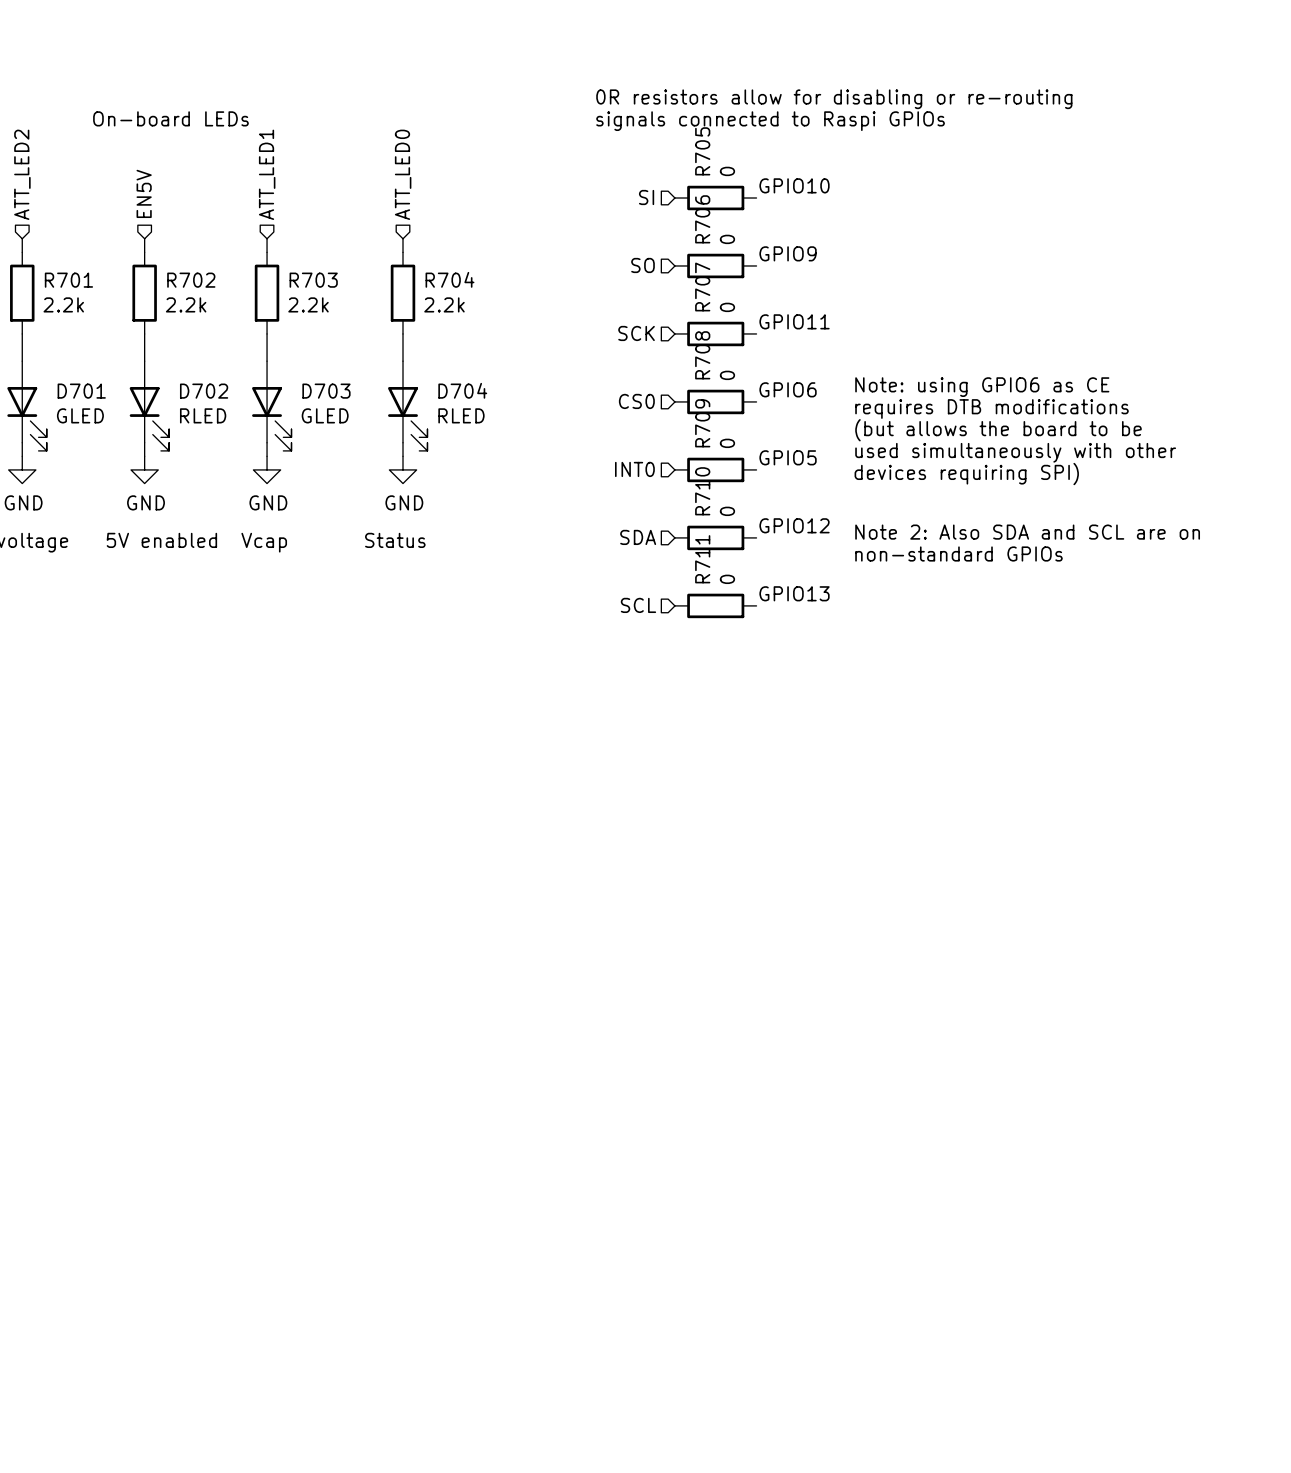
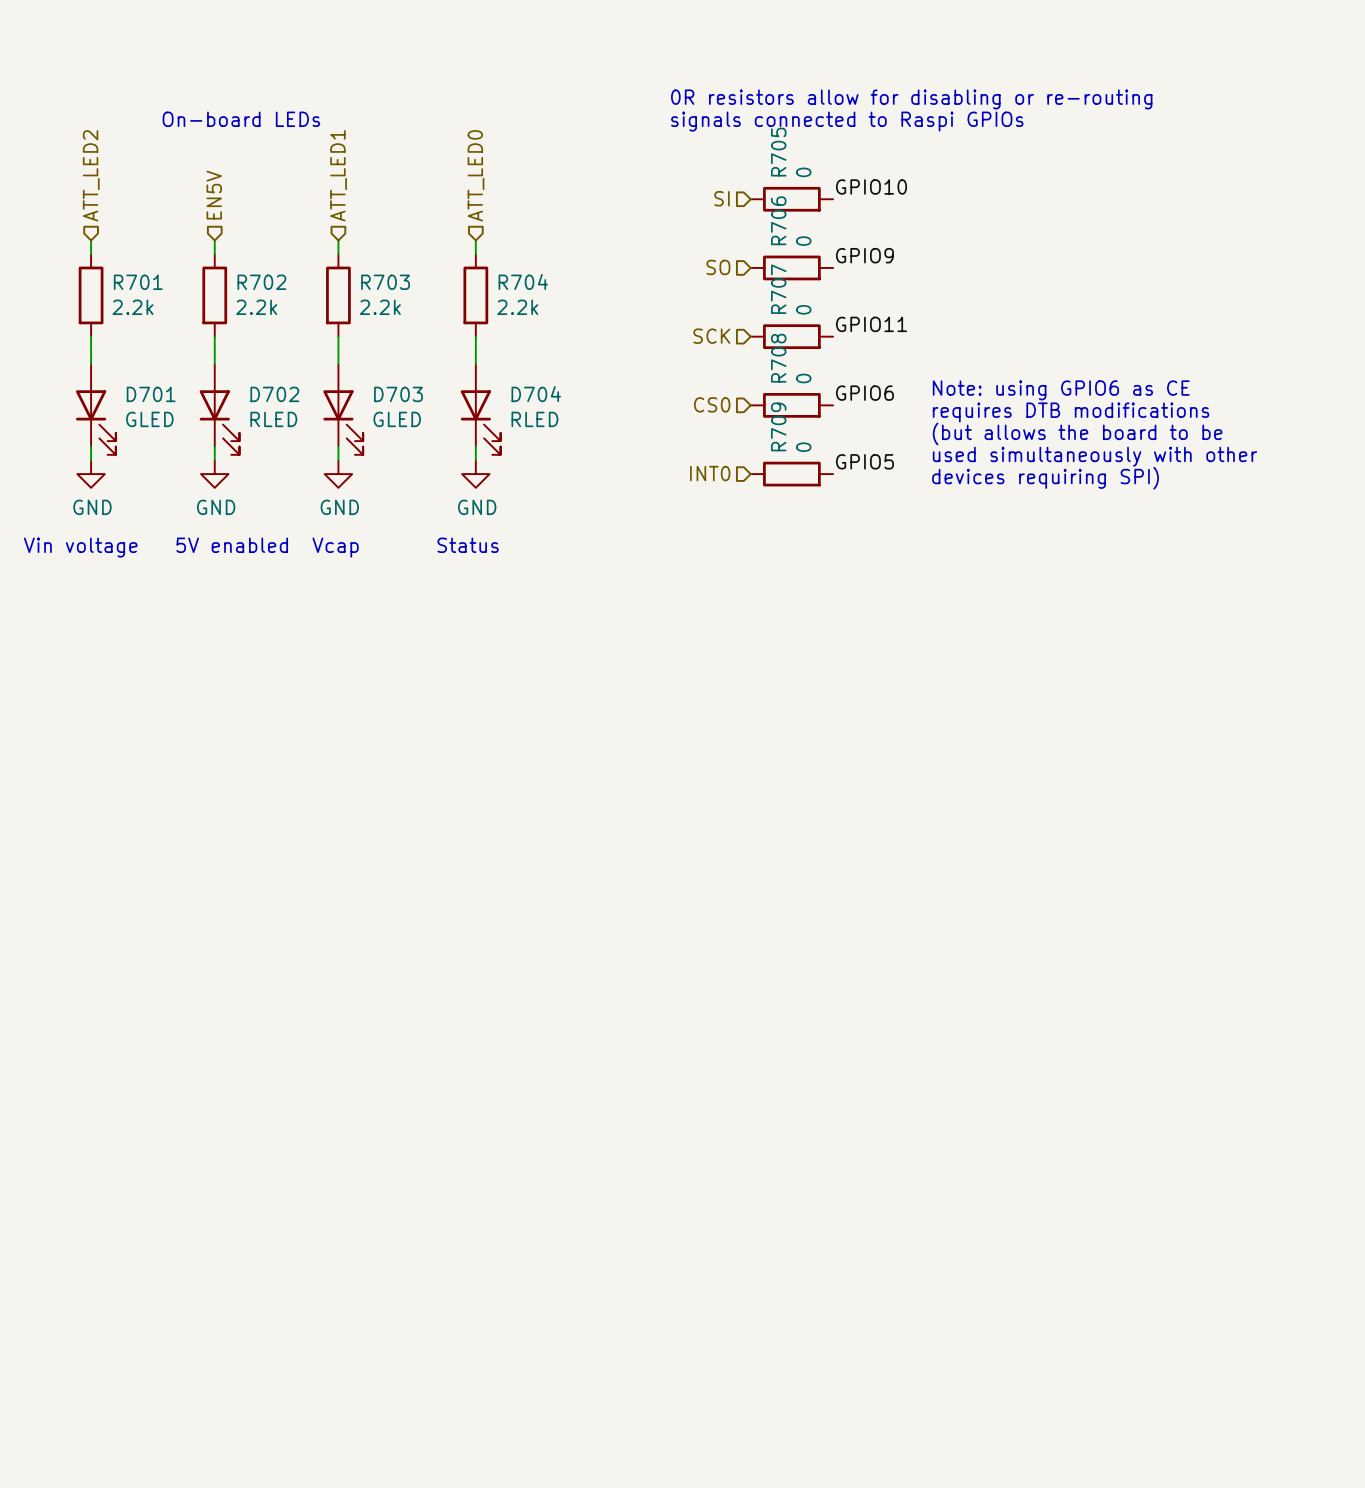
label: GPIO12 (794, 525) -> none
text: Note 2: Also SDA and SCL are on (1027, 532) -> none
hierarchical label: SDA (638, 537) -> none
R710: 0 (715, 537) -> none
text: non-standard GPIOs (958, 553) -> none
label: GPIO13 (794, 593) -> none
hierarchical label: SCL (638, 605) -> none
R711: 0 (715, 605) -> none

